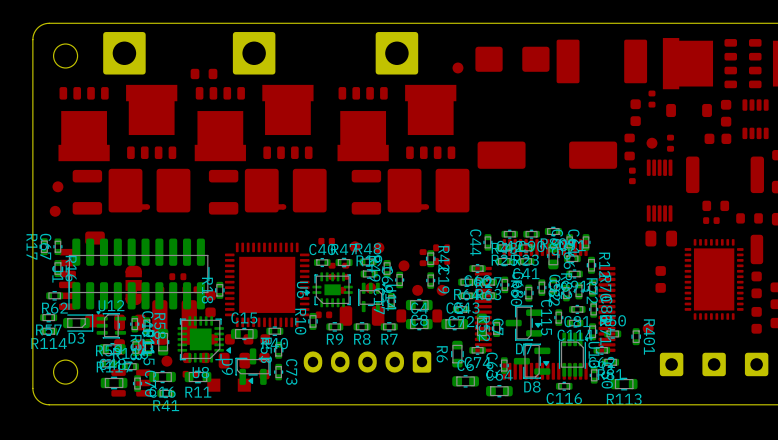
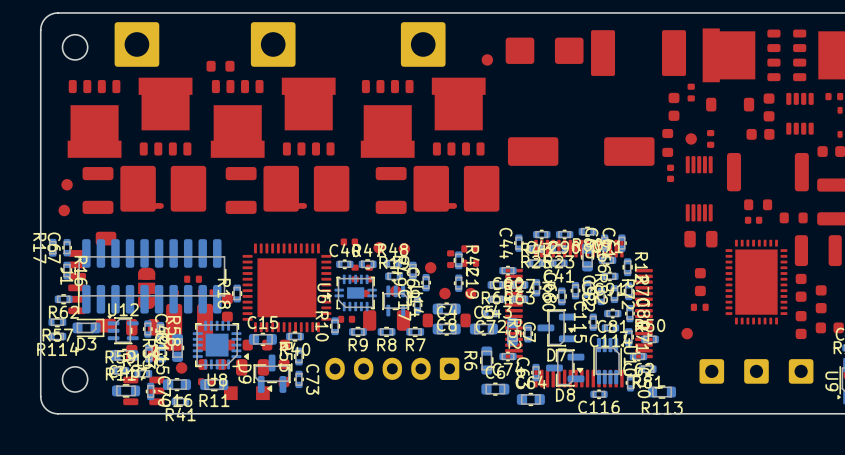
R401 side: bottom (636, 336) -> top (699, 307)

